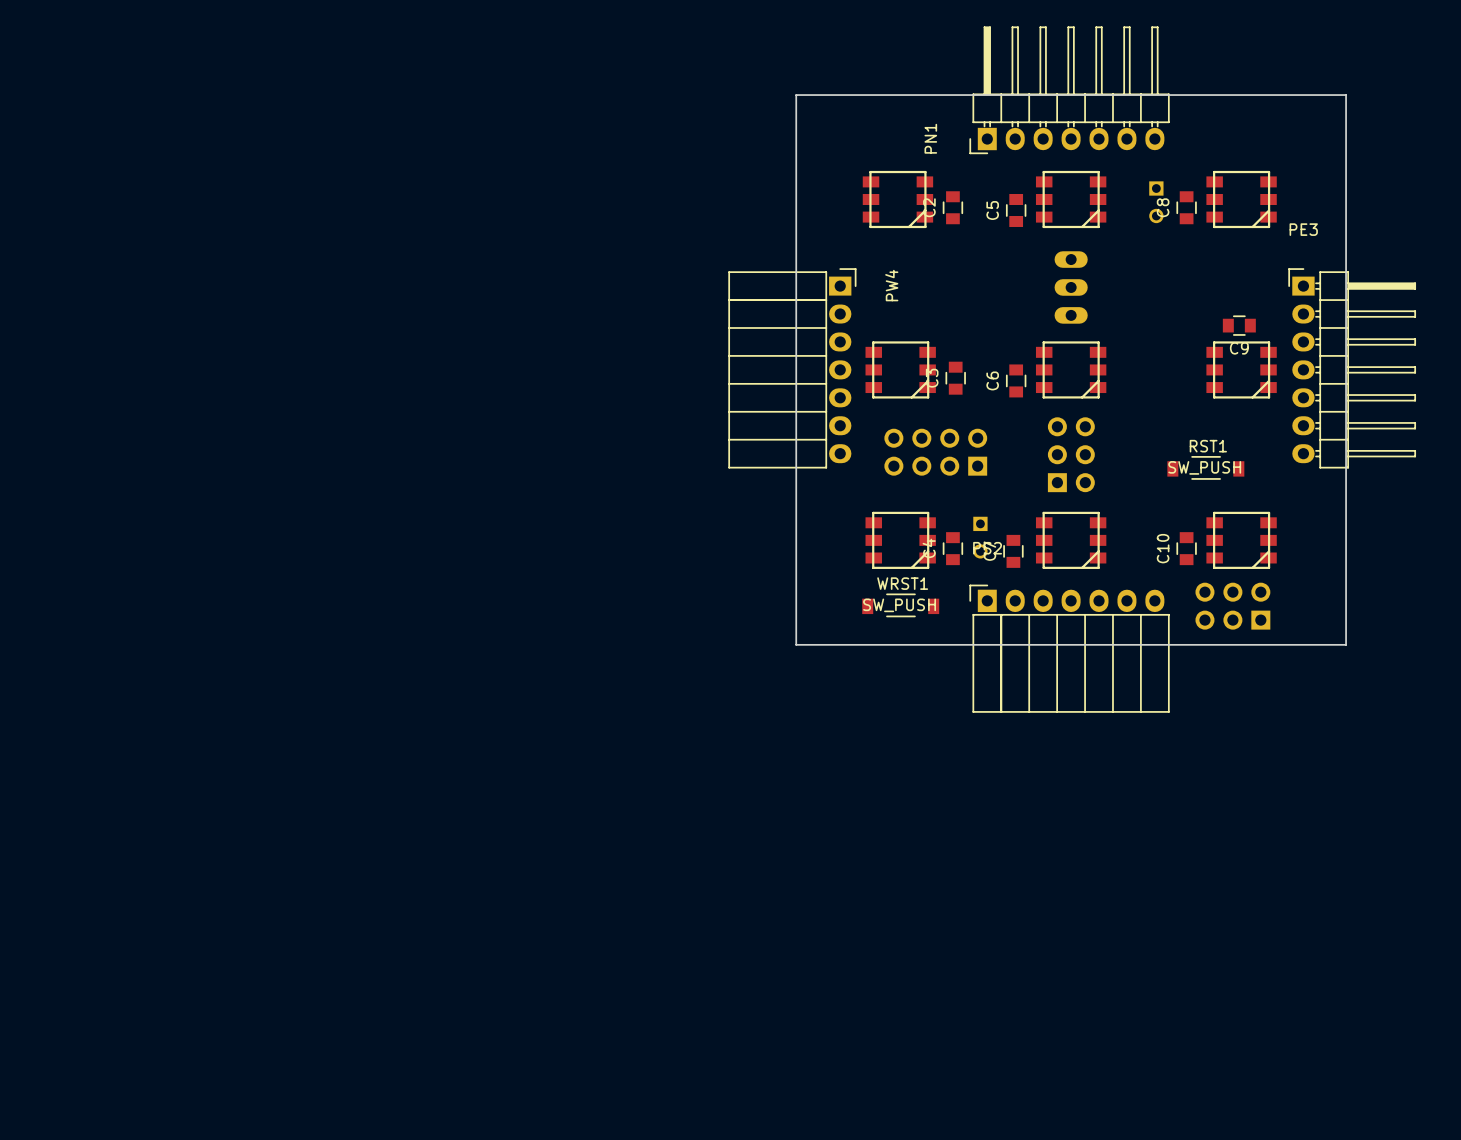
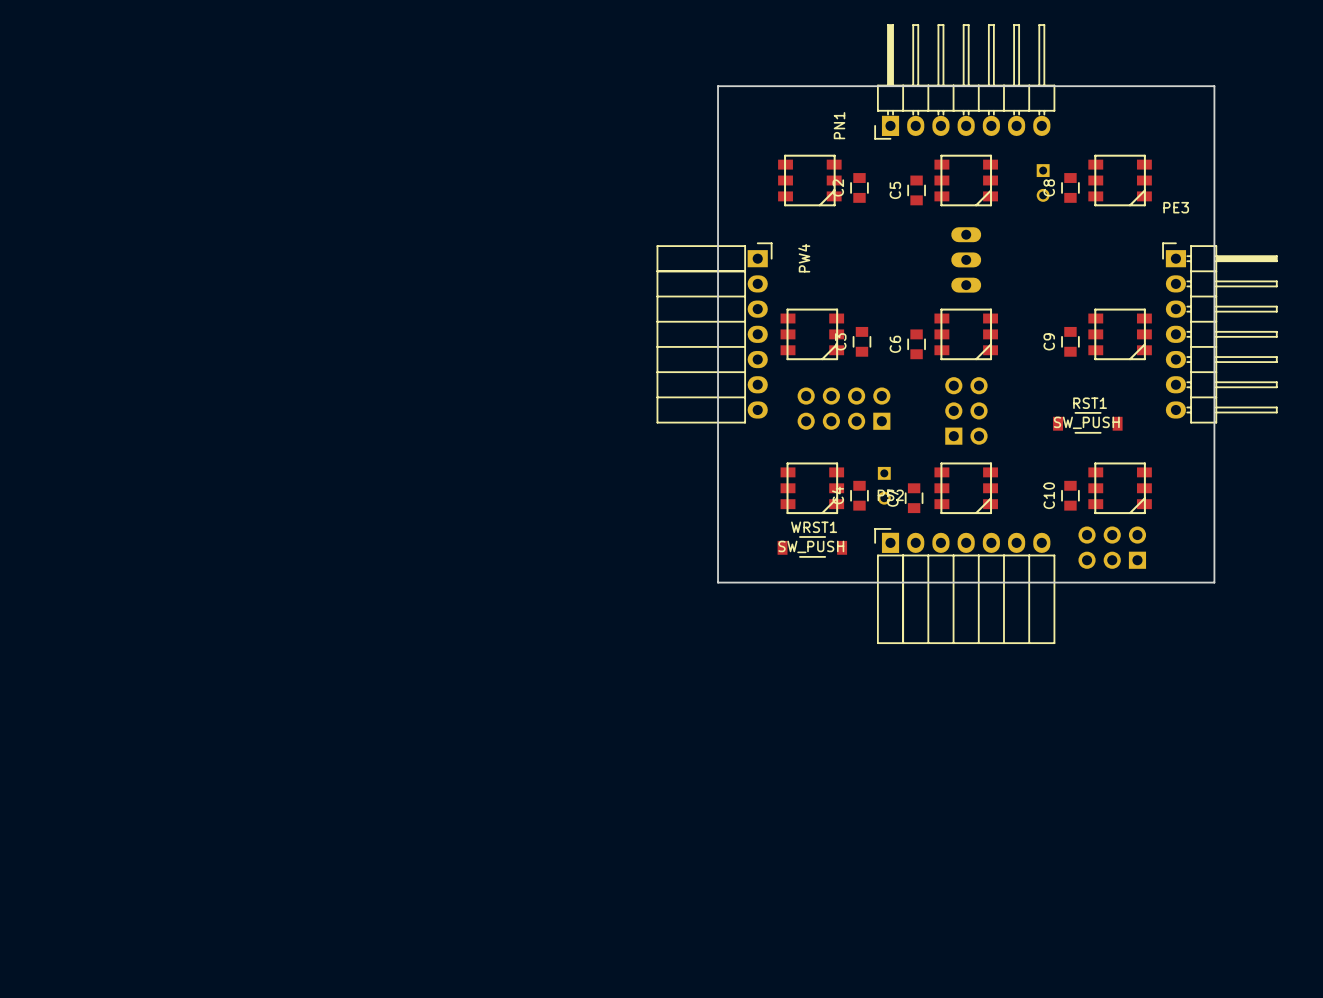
C9 rotation: 0° (1239, 325) -> 90° clockwise (1070, 341)
C9 position: (1239, 325) -> (1070, 341)

